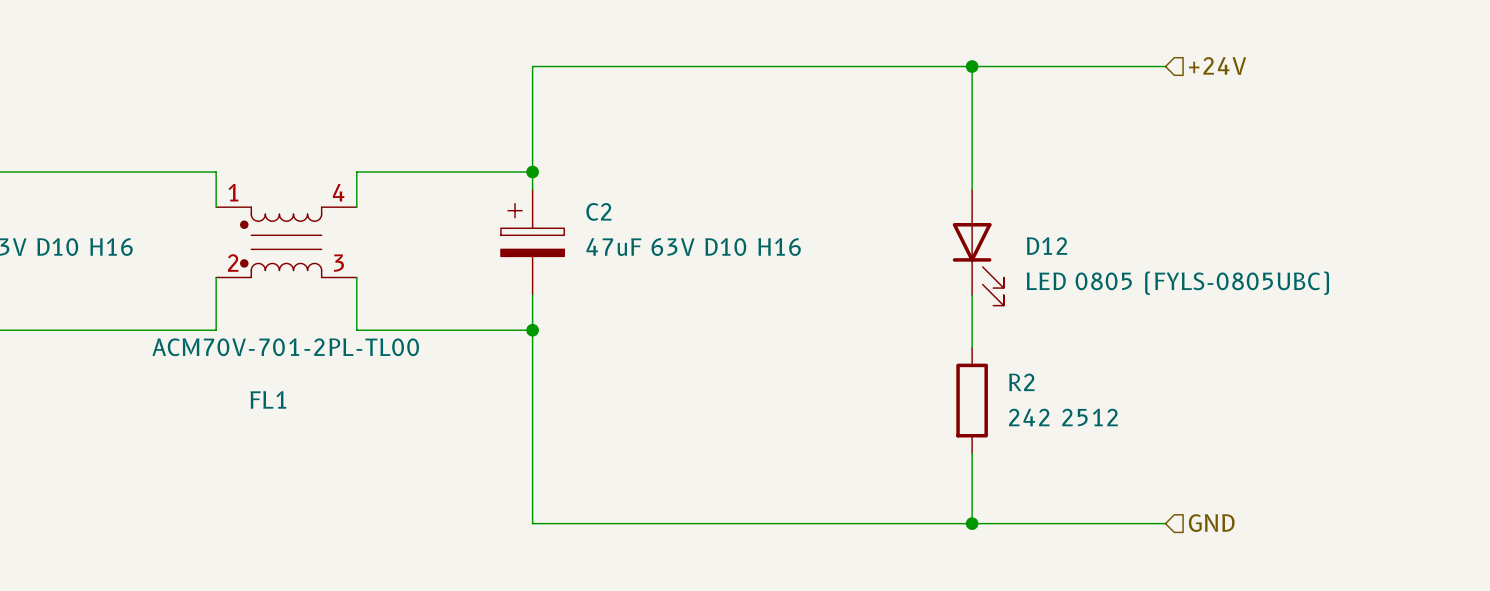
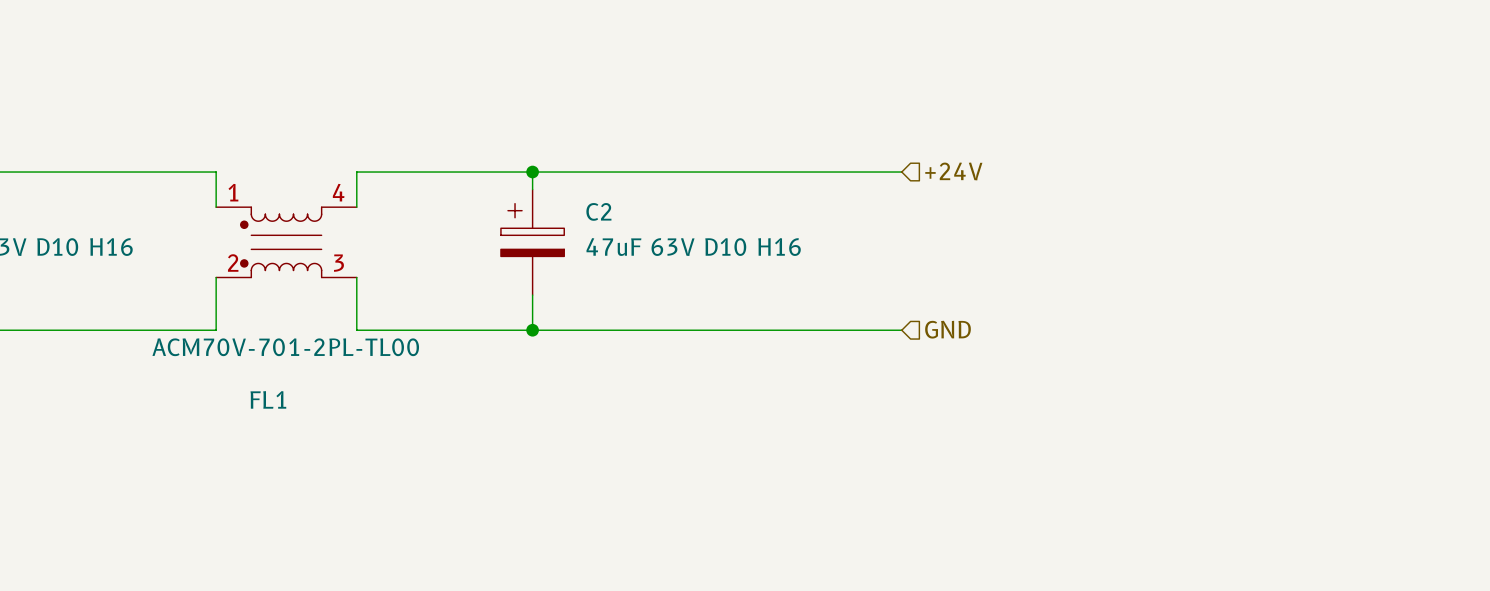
hierarchical label position: +24V (1217, 65) -> +24V (953, 171)
wire: (972, 66) (972, 189) -> none
junction: (972, 66) -> none
wire: (1165, 66) (532, 66) (532, 172) -> (901, 172) (532, 172)
D12: LED 0805 (FYLS-0805UBC) (978, 247) -> none
wire: (972, 295) (972, 347) -> none
wire: (532, 330) (532, 523) (1165, 523) -> (532, 330) (901, 330)
R2: 242 2512 (972, 400) -> none
wire: (972, 453) (972, 523) -> none
junction: (972, 523) -> none
hierarchical label position: GND (1211, 523) -> GND (947, 329)

